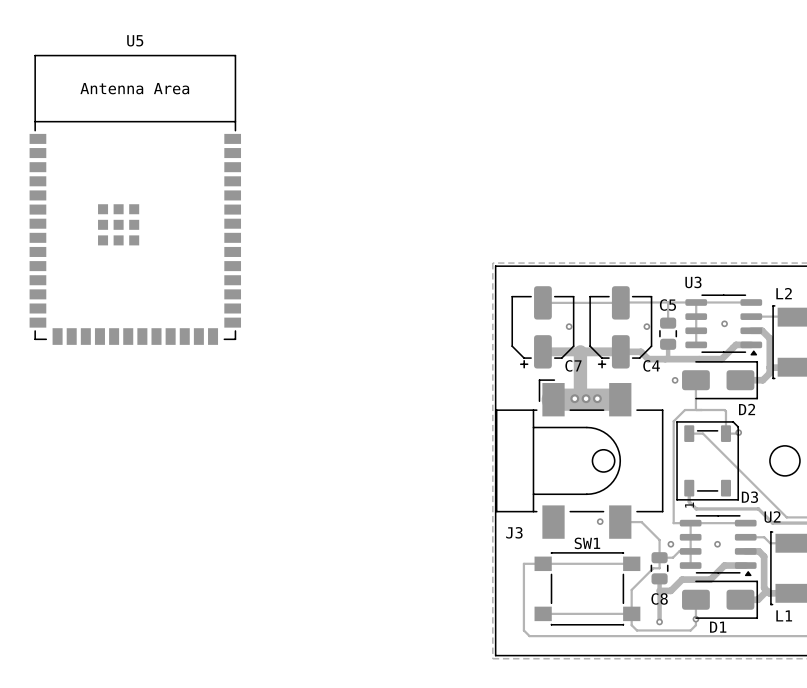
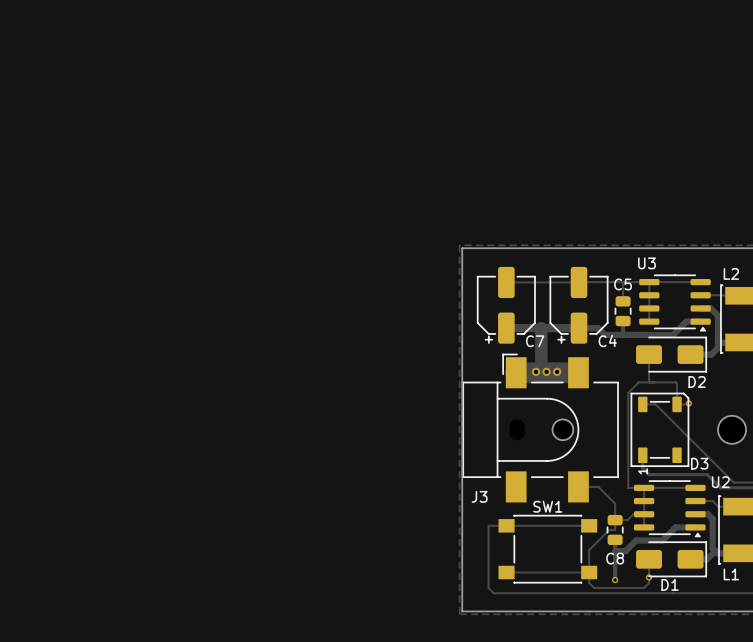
U5: (135, 199) -> none
via: (724, 323) -> none
via: (569, 326) -> none
via: (646, 326) -> none
via: (675, 380) -> none
via: (600, 521) -> none
via: (670, 544) -> none
via: (717, 544) -> none

